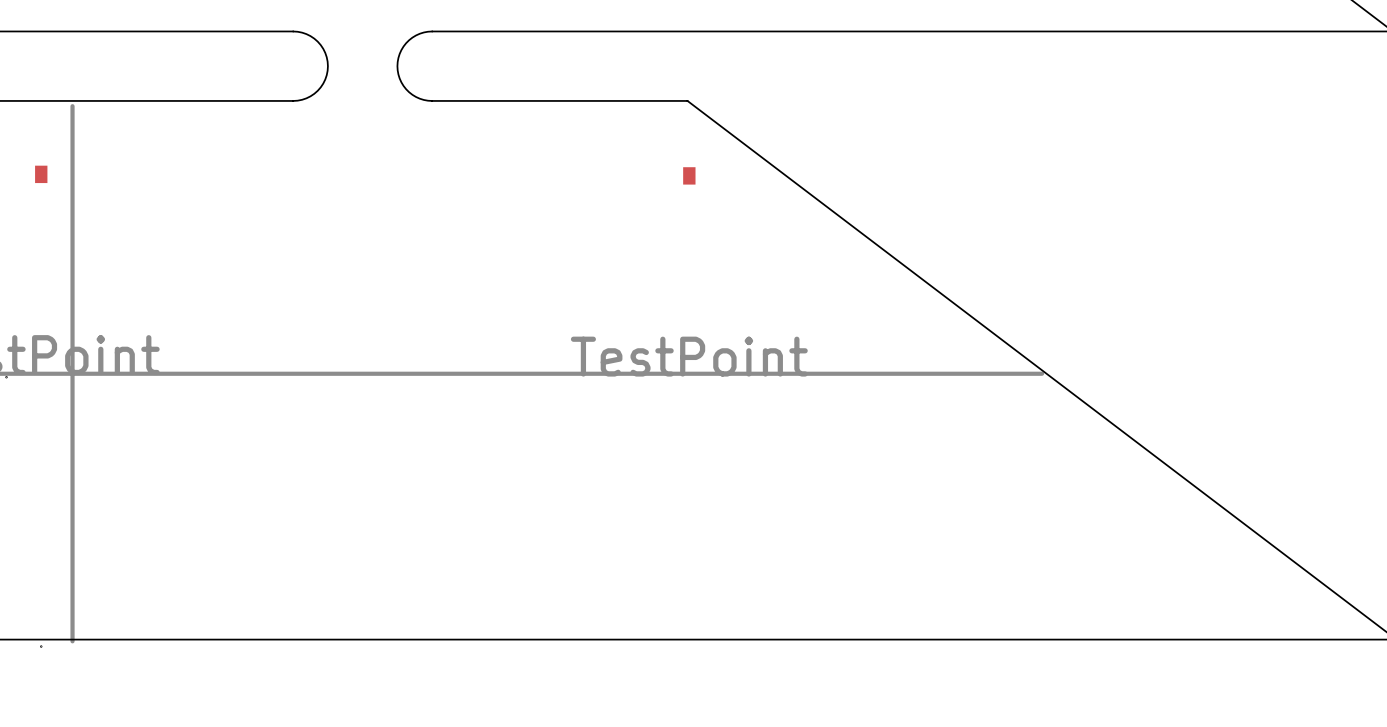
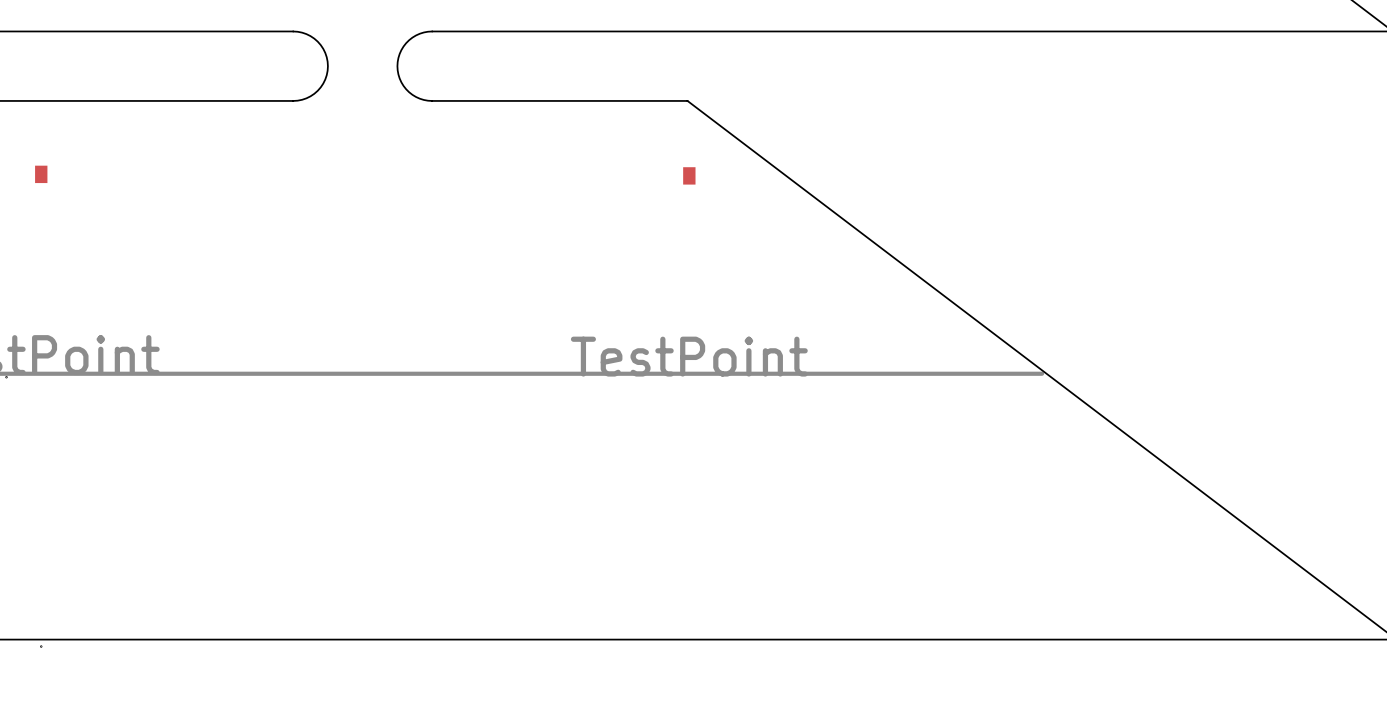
line: (72, 106) (72, 641) -> none

